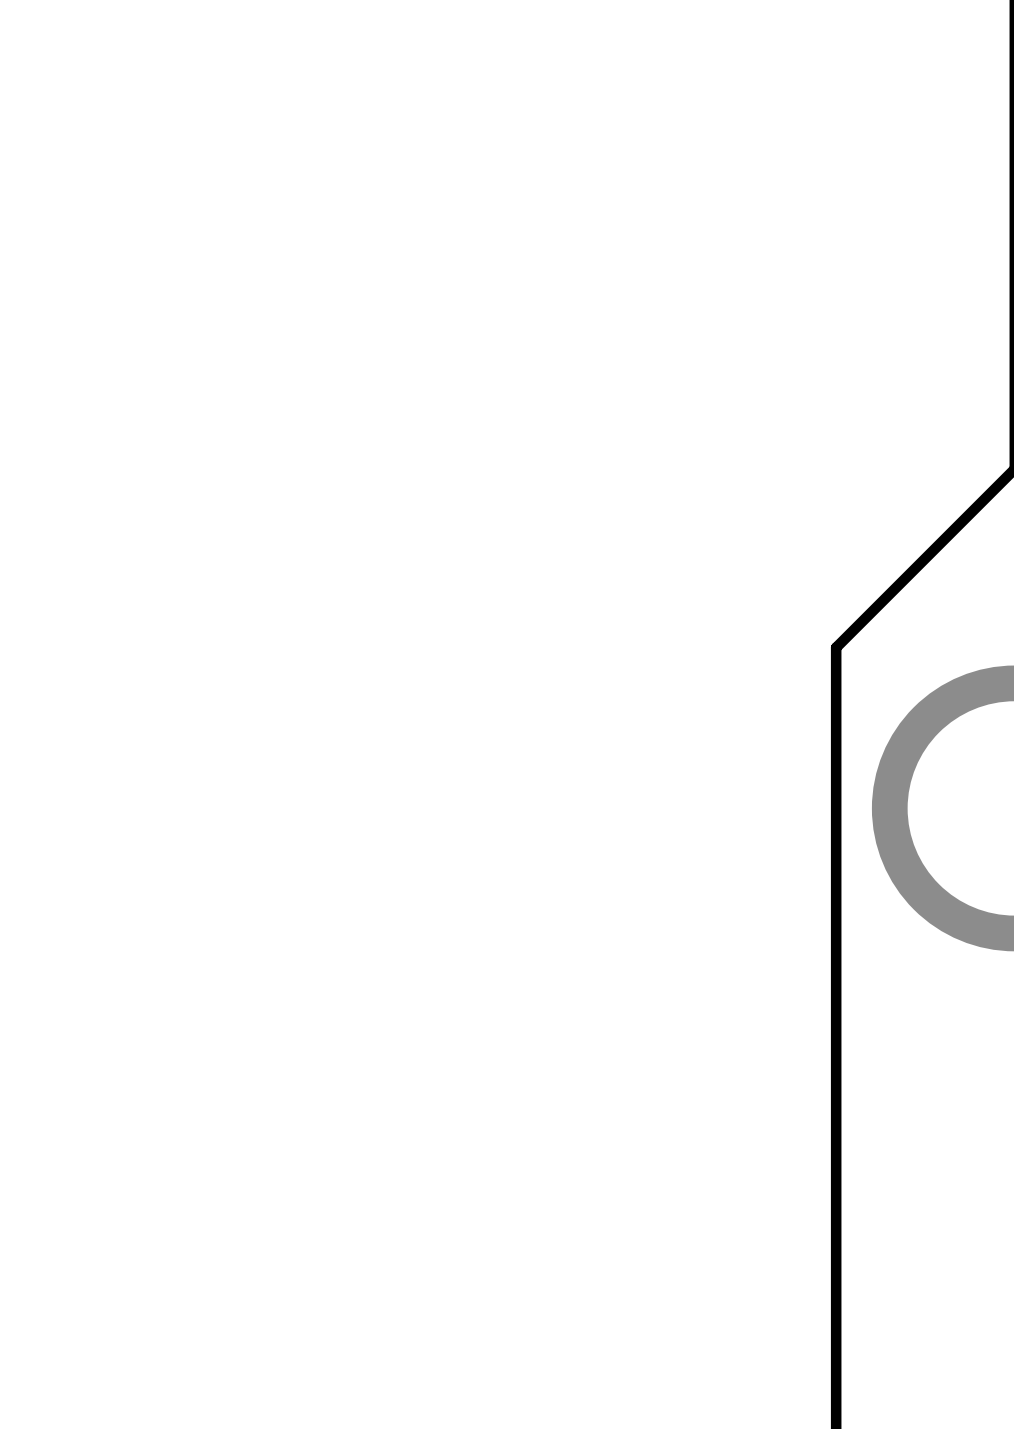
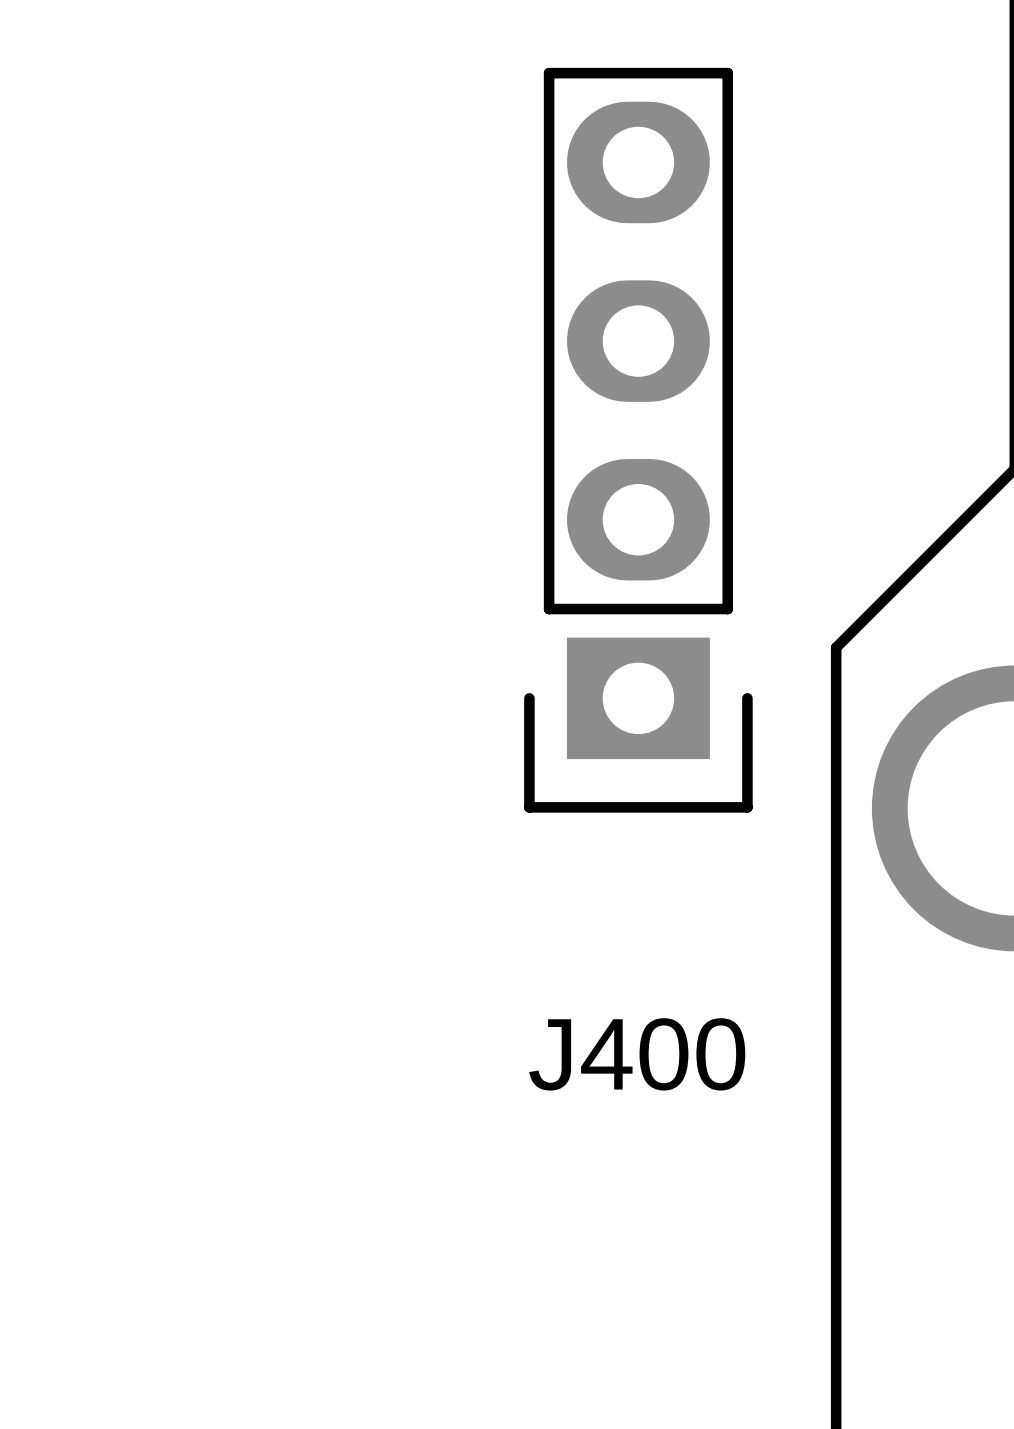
J400: none -> (638, 440)

